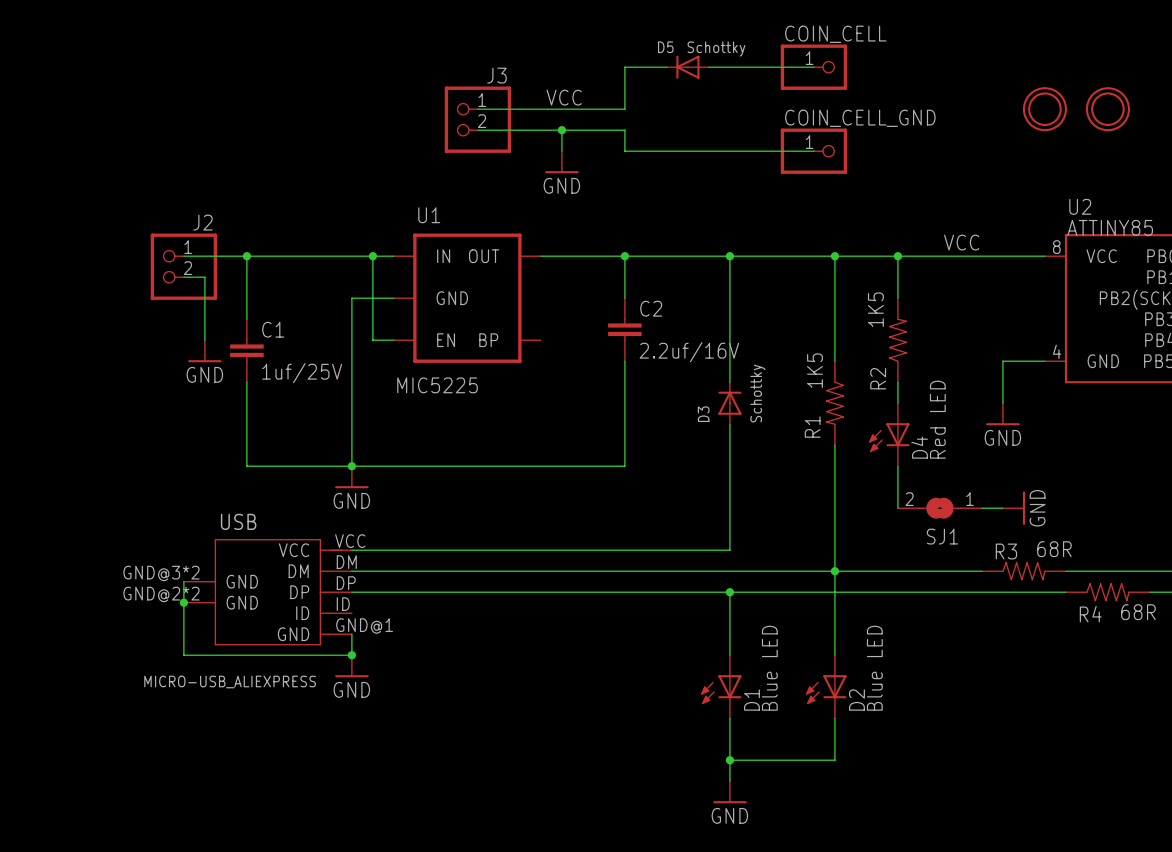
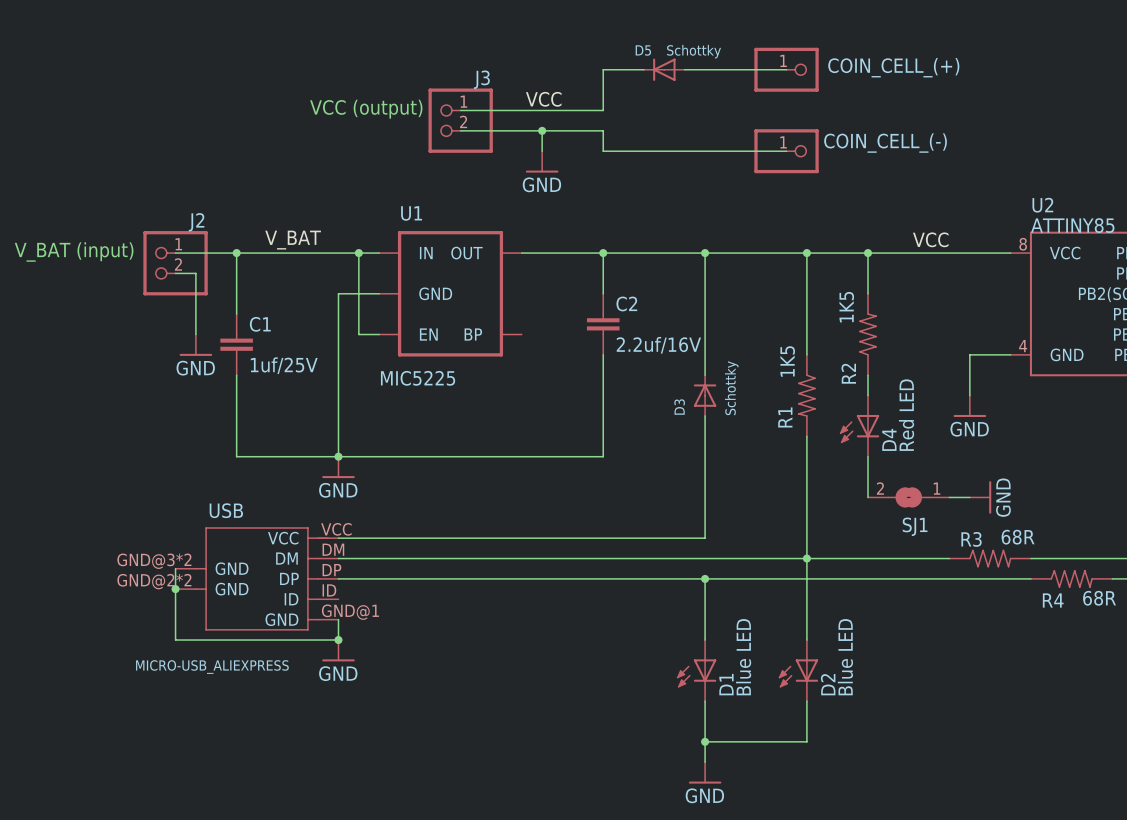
COIN_CELL name: COIN_CELL (835, 34) -> COIN_CELL_(+) (893, 67)
text: none -> VCC (output) (366, 109)
part: (1044, 109) -> none
part: (1107, 109) -> none
COIN_CELL_GND name: COIN_CELL_GND (860, 118) -> COIN_CELL_(-) (885, 143)
label: none -> V_BAT (293, 240)
text: none -> V_BAT (input) (74, 252)

